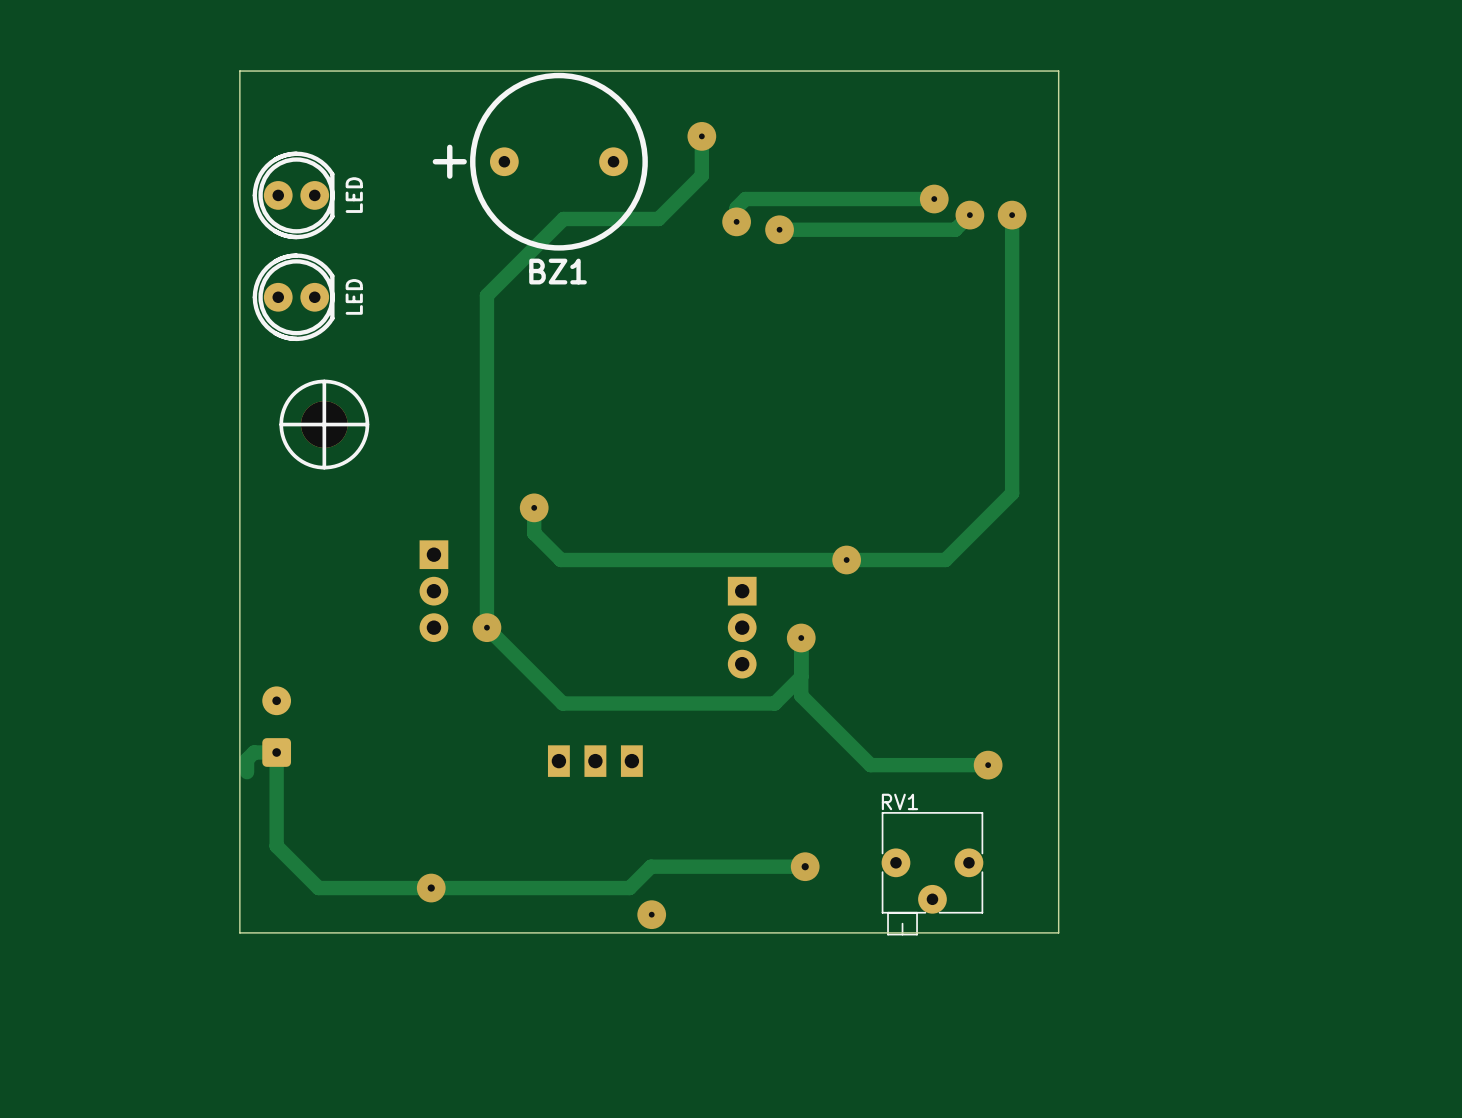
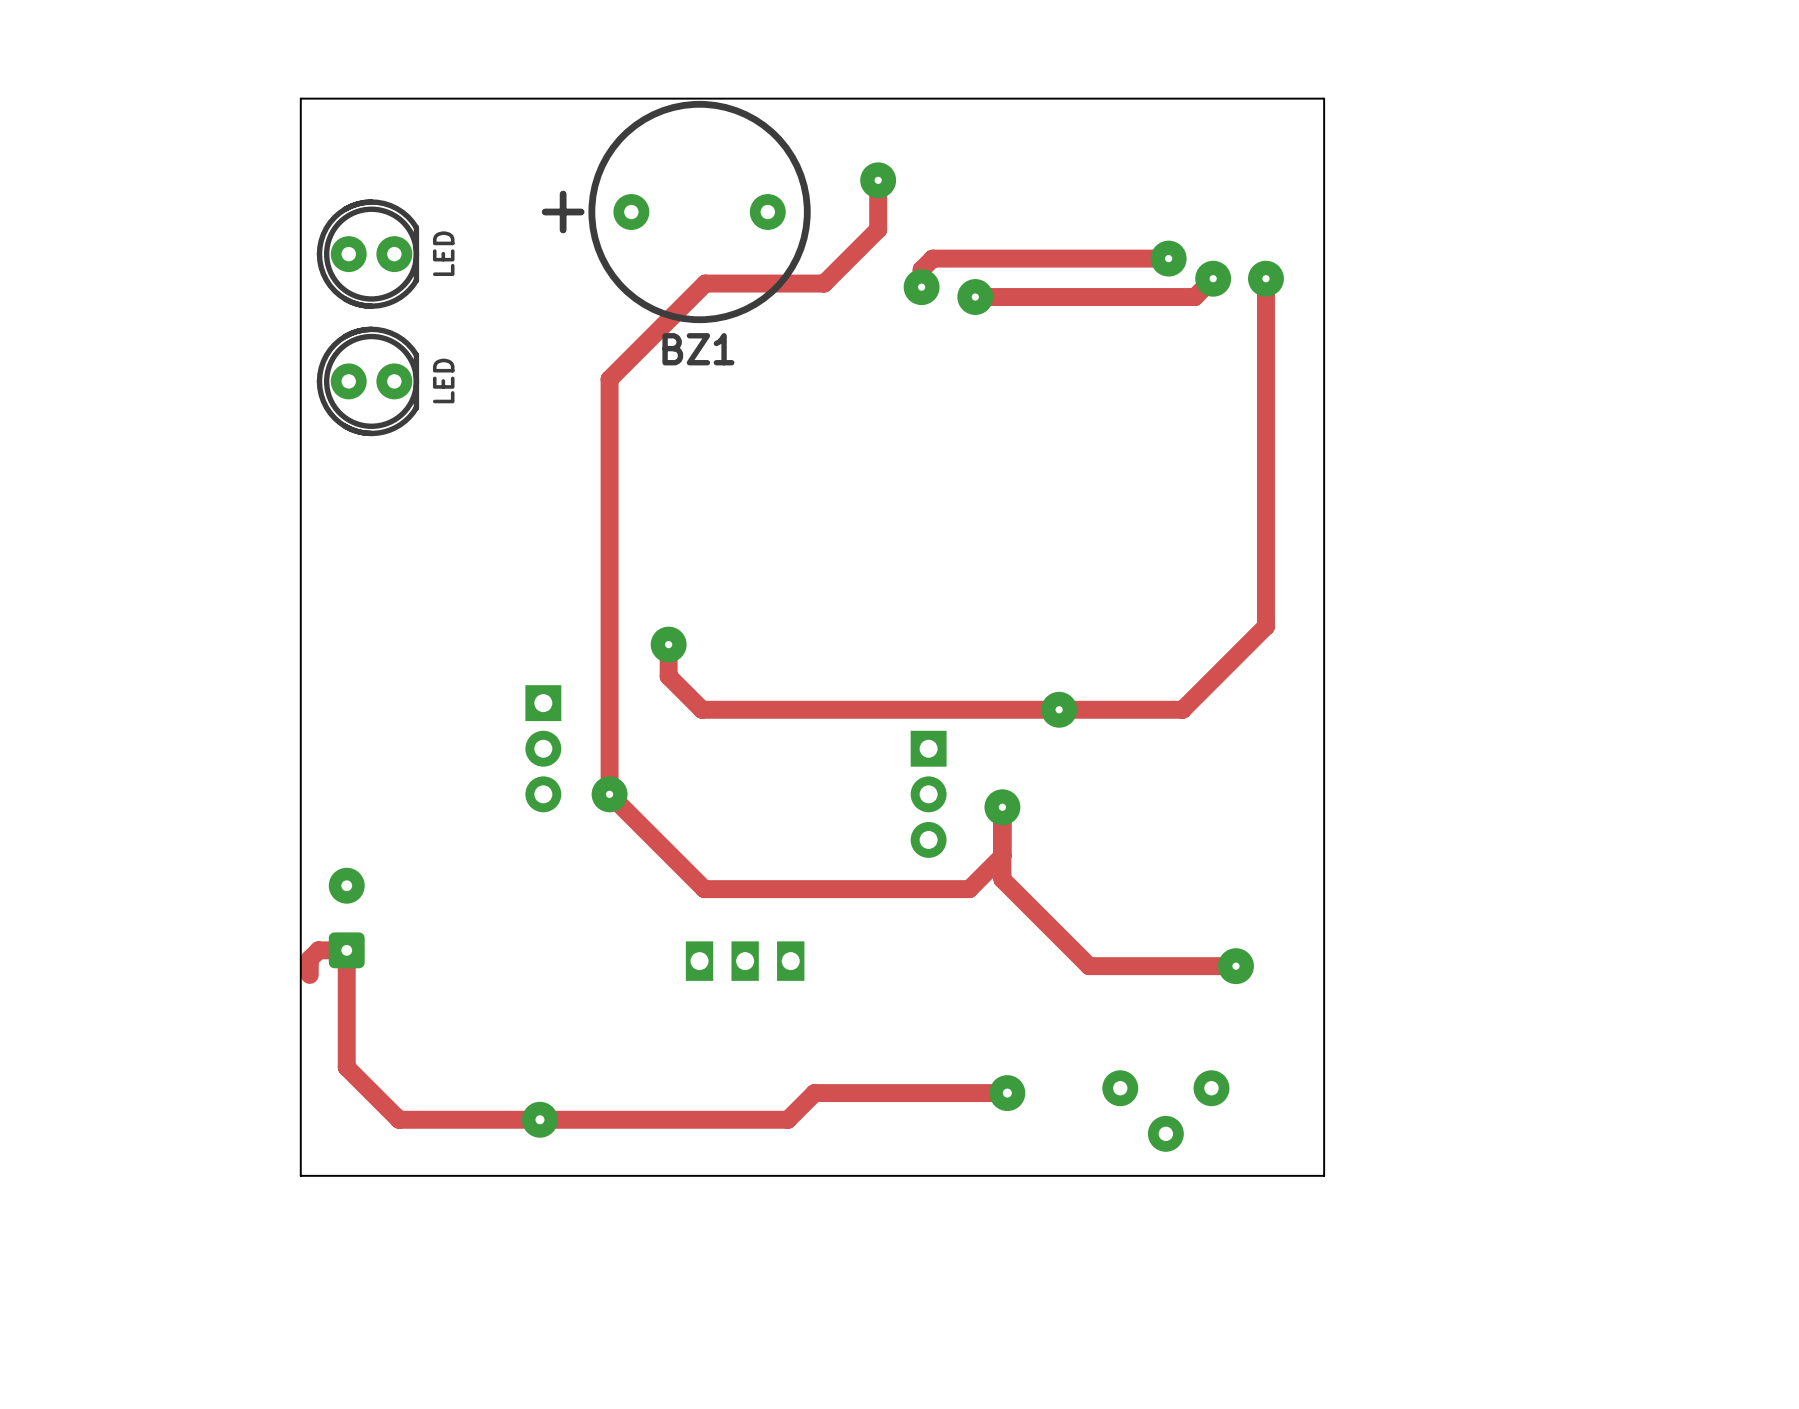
part: (324, 424) -> none
RV1 side: top (932, 873) -> bottom (1165, 1111)
via: (651, 914) -> none

